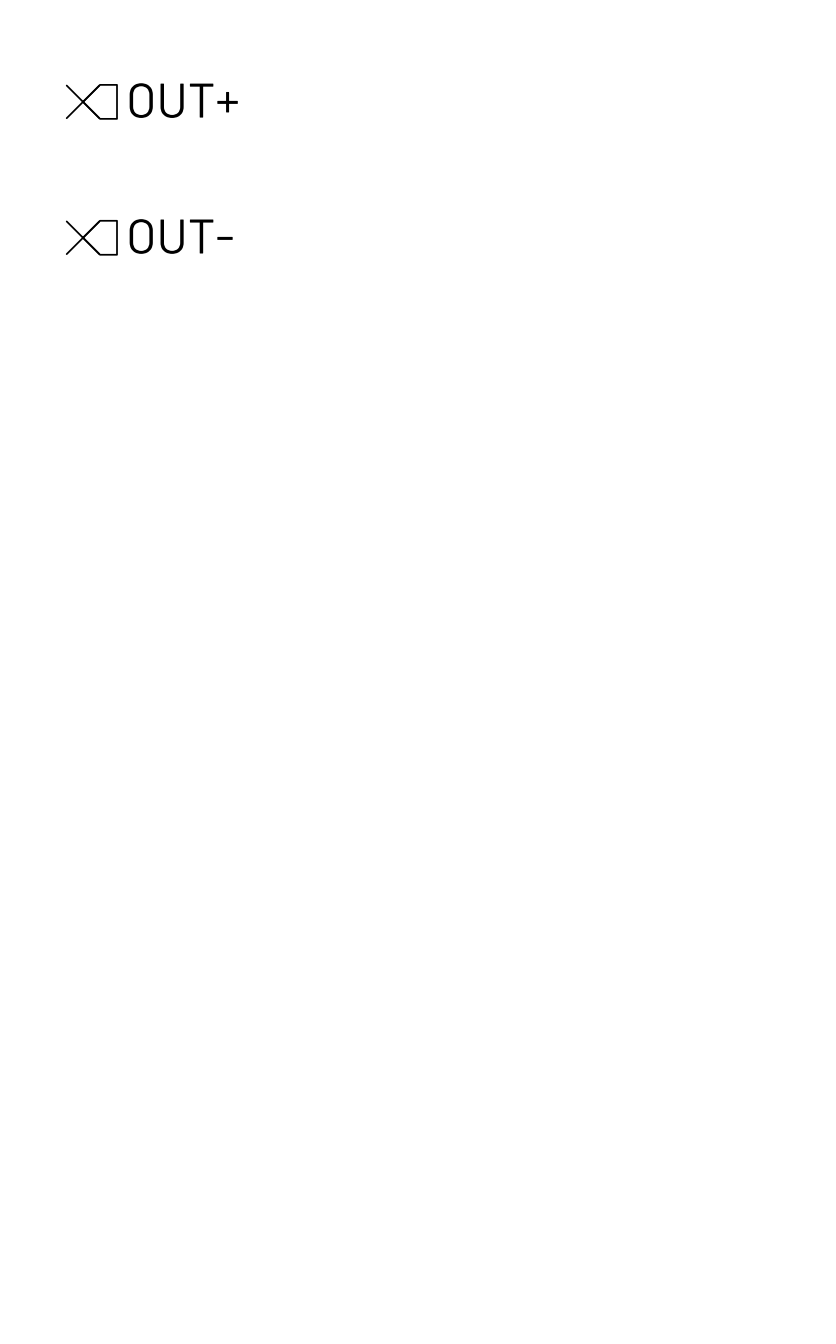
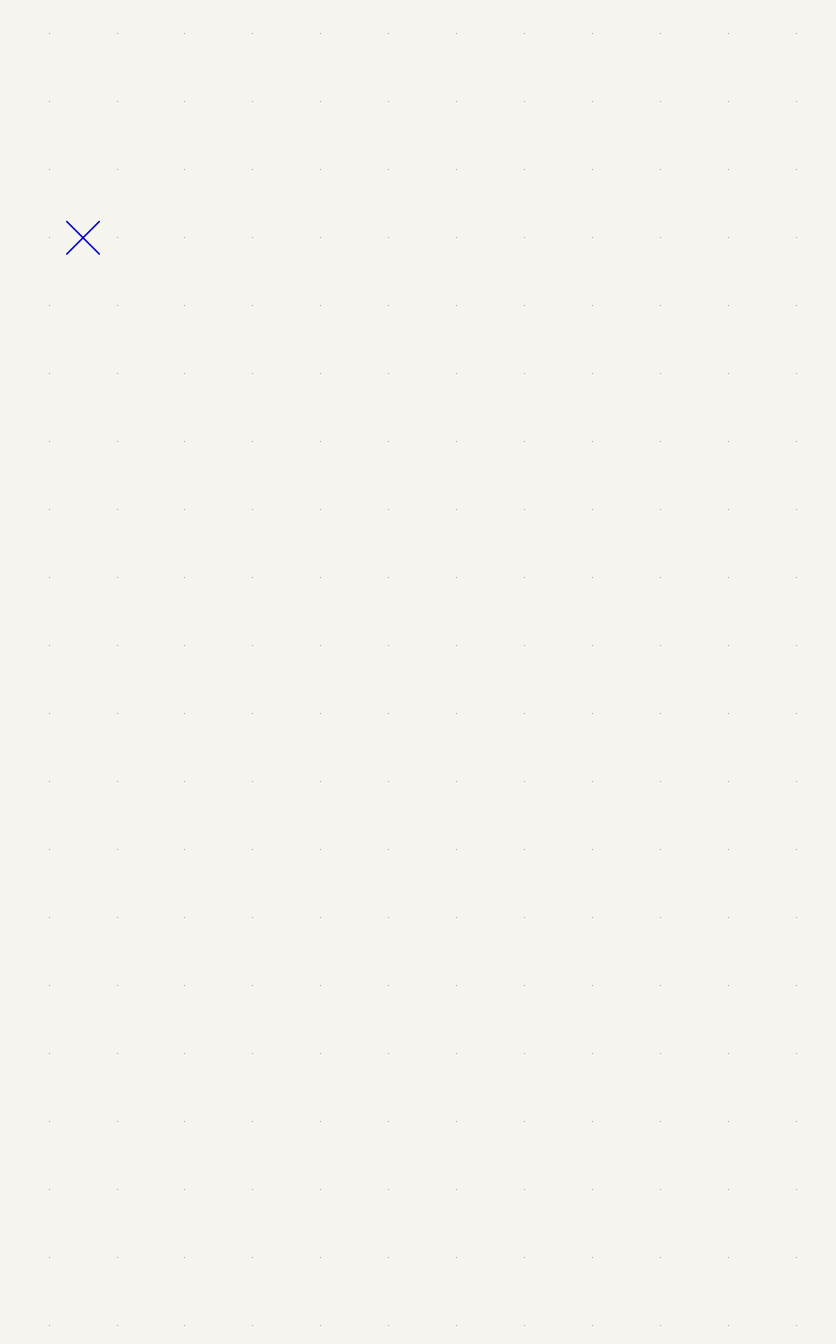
hierarchical label: OUT+ (183, 100) -> none
no-connect mark: (83, 101) -> none
hierarchical label: OUT- (181, 236) -> none

